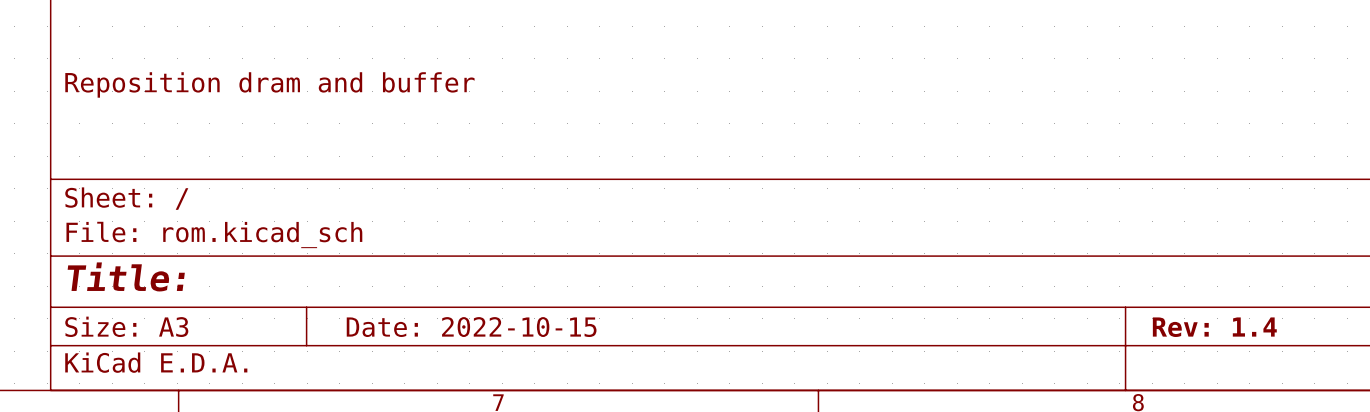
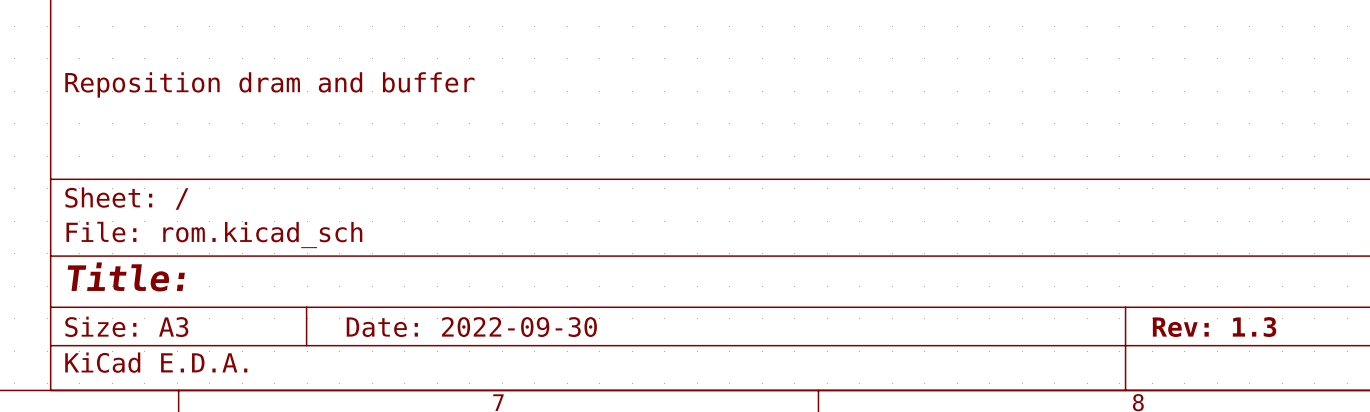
title block: Date: 2022-10-15 (471, 327) -> Date: 2022-09-30 (471, 327)
title block: Rev: 1.4 (1214, 327) -> Rev: 1.3 (1214, 327)

